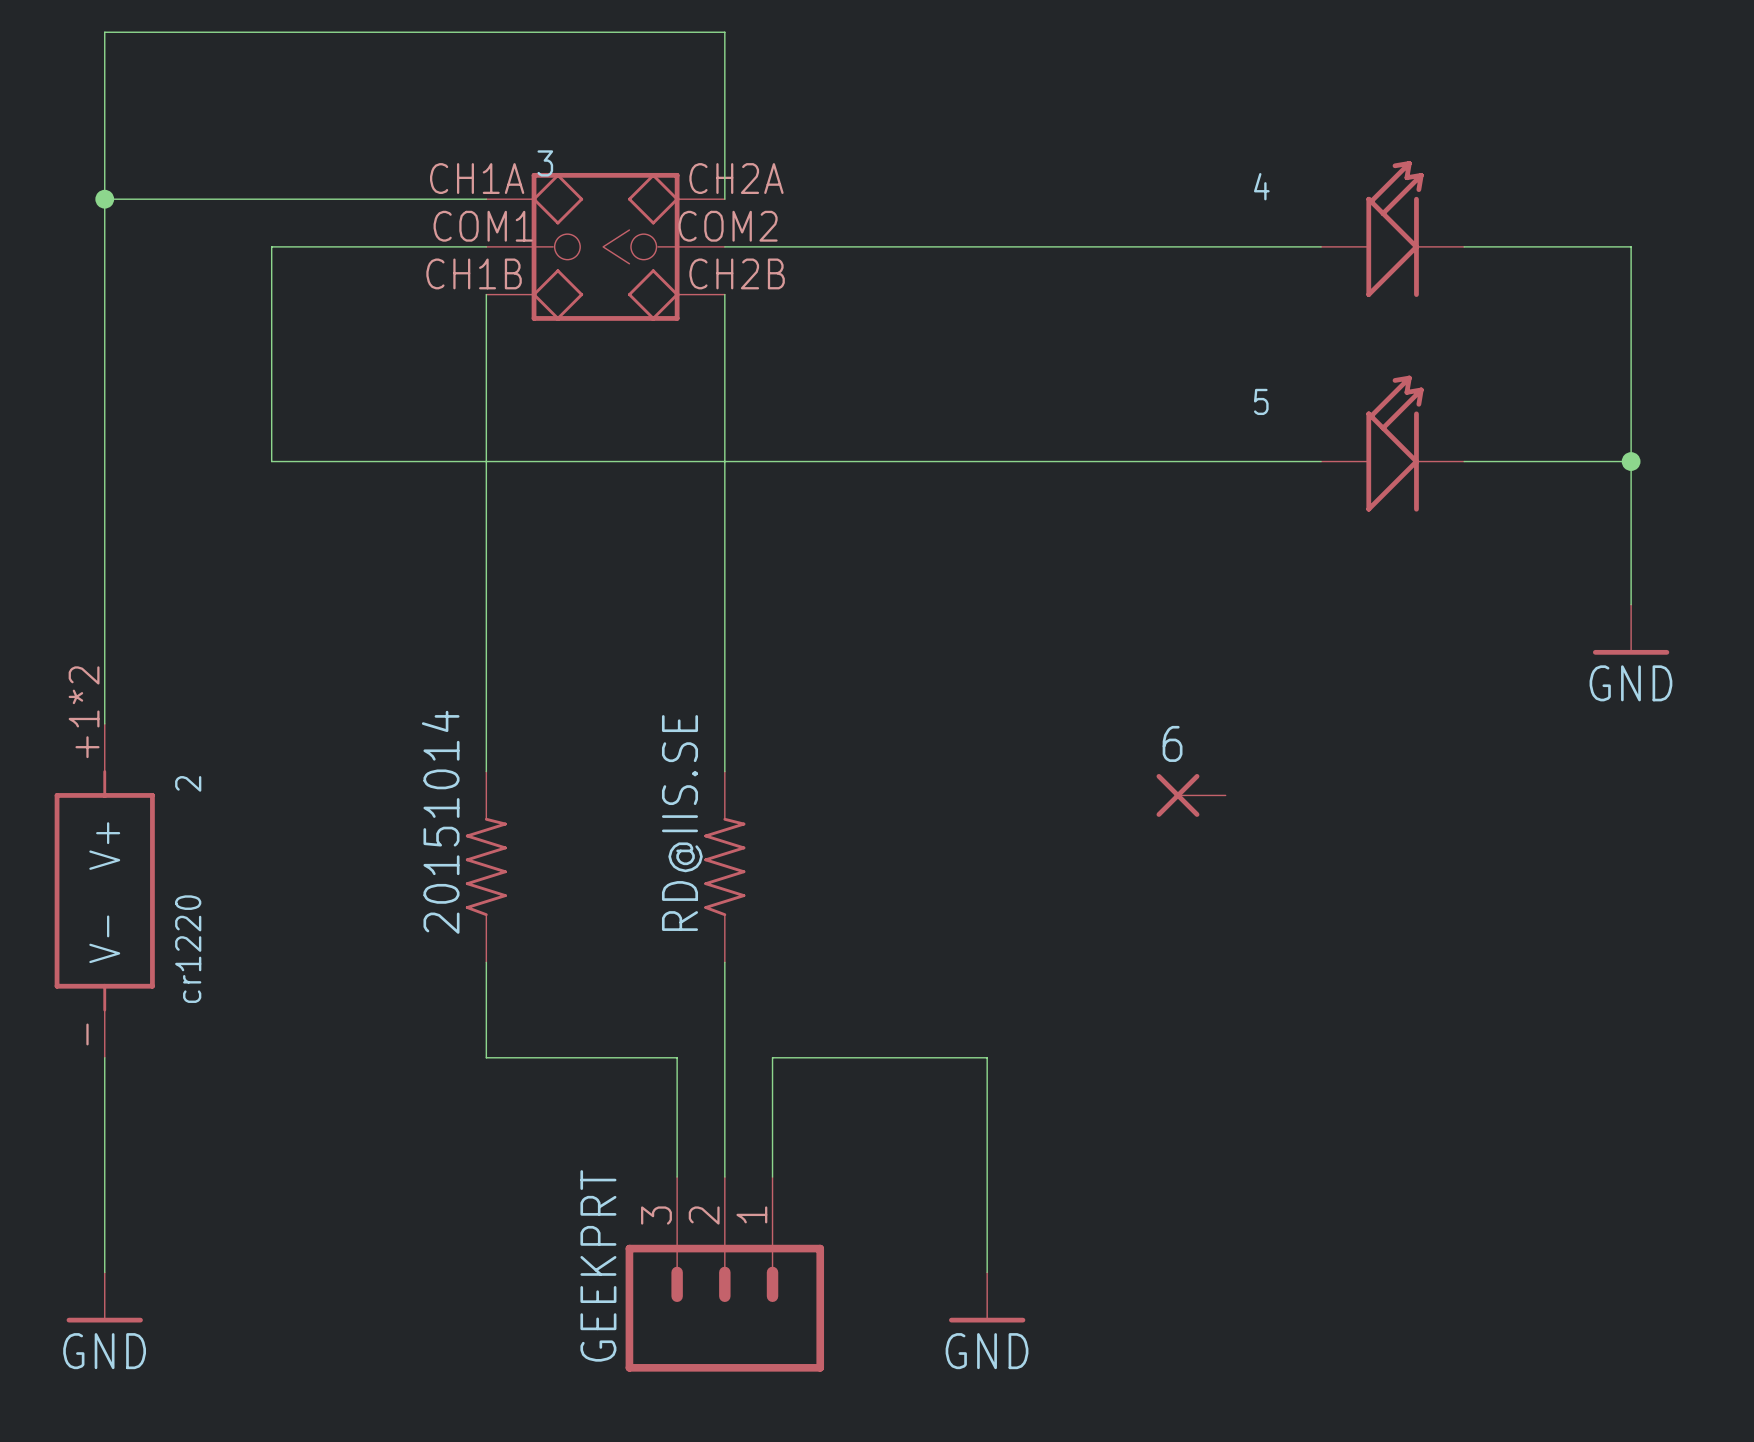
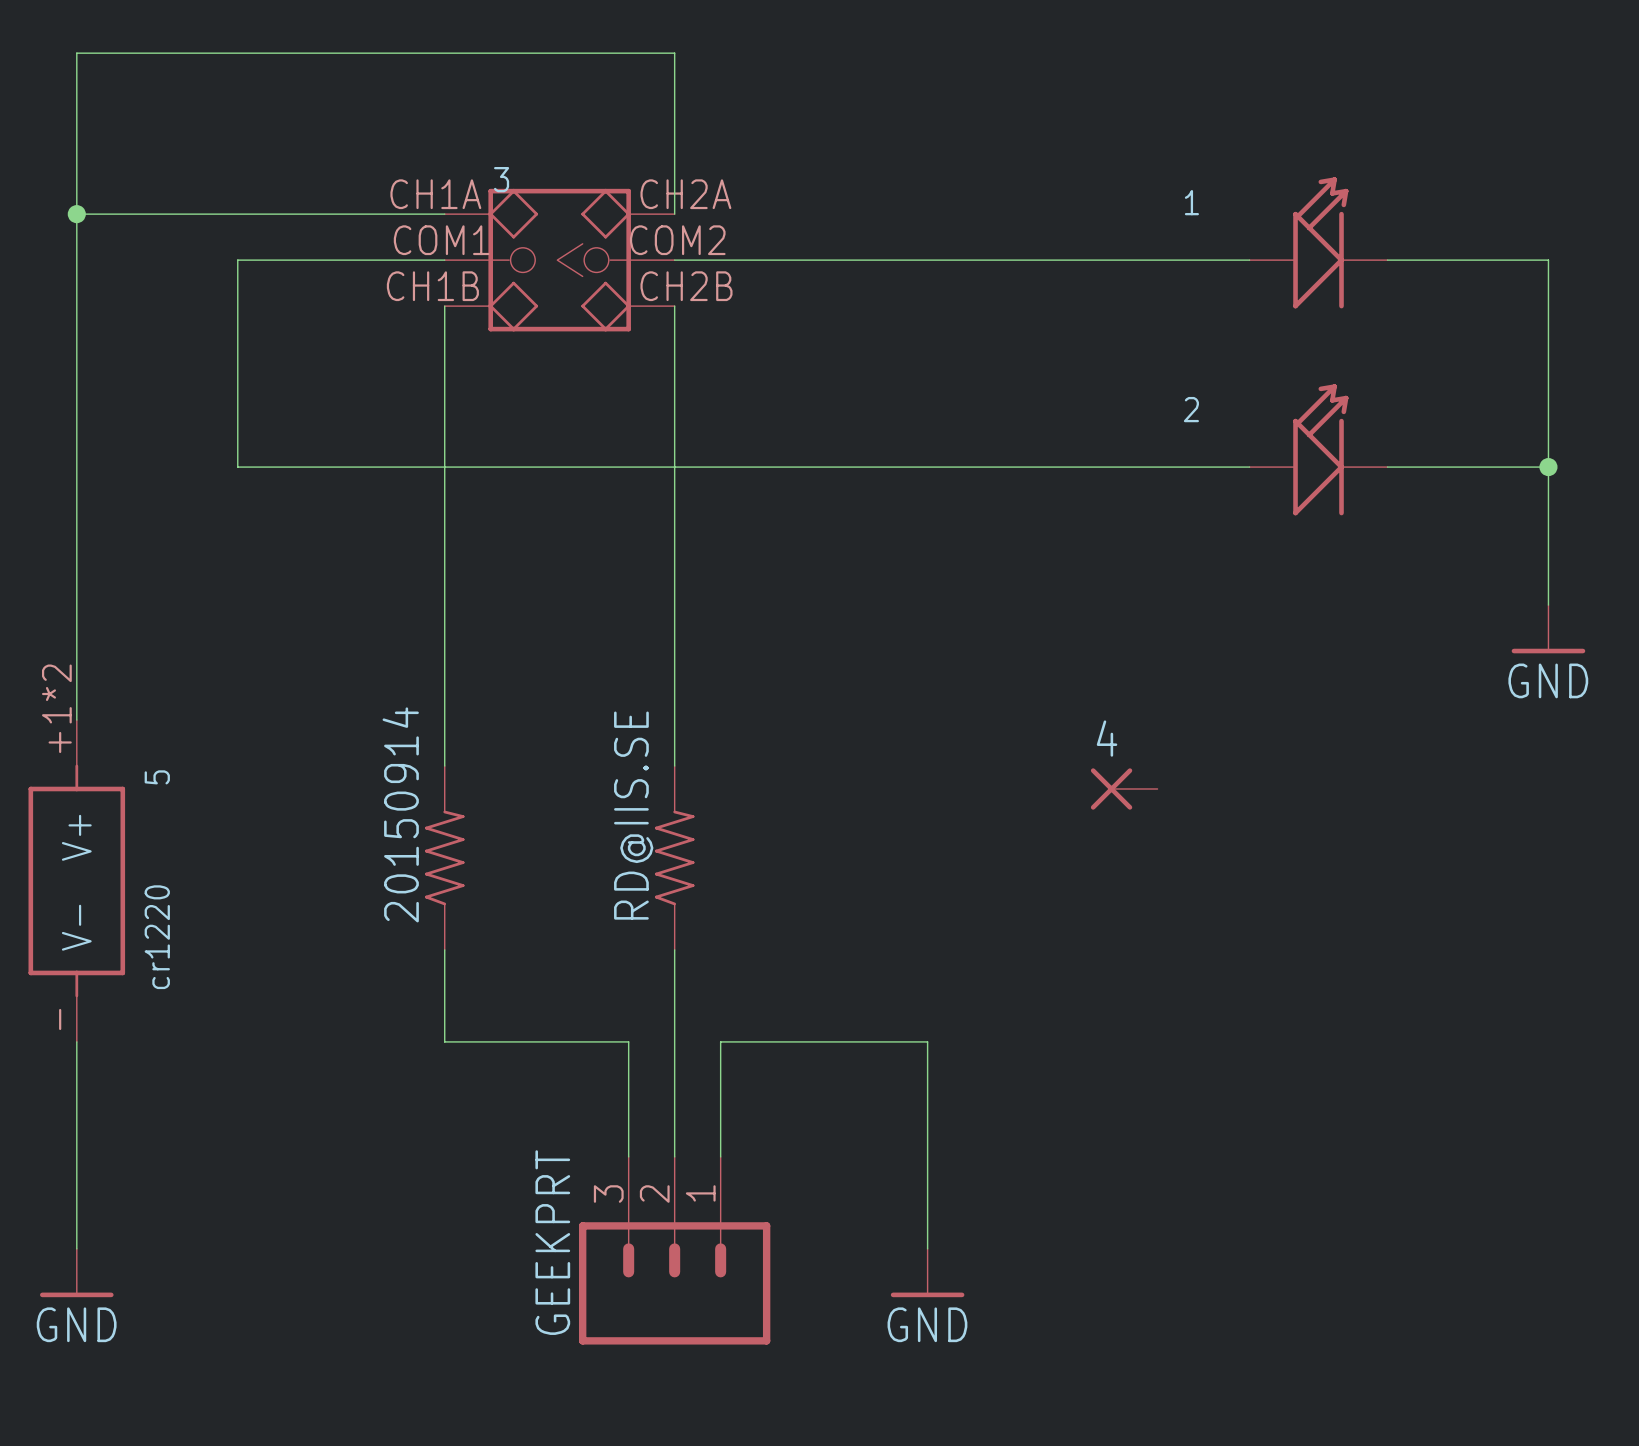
4 name: 4 (1261, 186) -> 1 (1191, 202)
5 name: 5 (1261, 401) -> 2 (1191, 409)
6 name: 6 (1172, 743) -> 4 (1107, 738)
2 name: 2 (188, 783) -> 5 (157, 777)
20151014 name: 20151014 (440, 822) -> 20150914 (400, 814)

